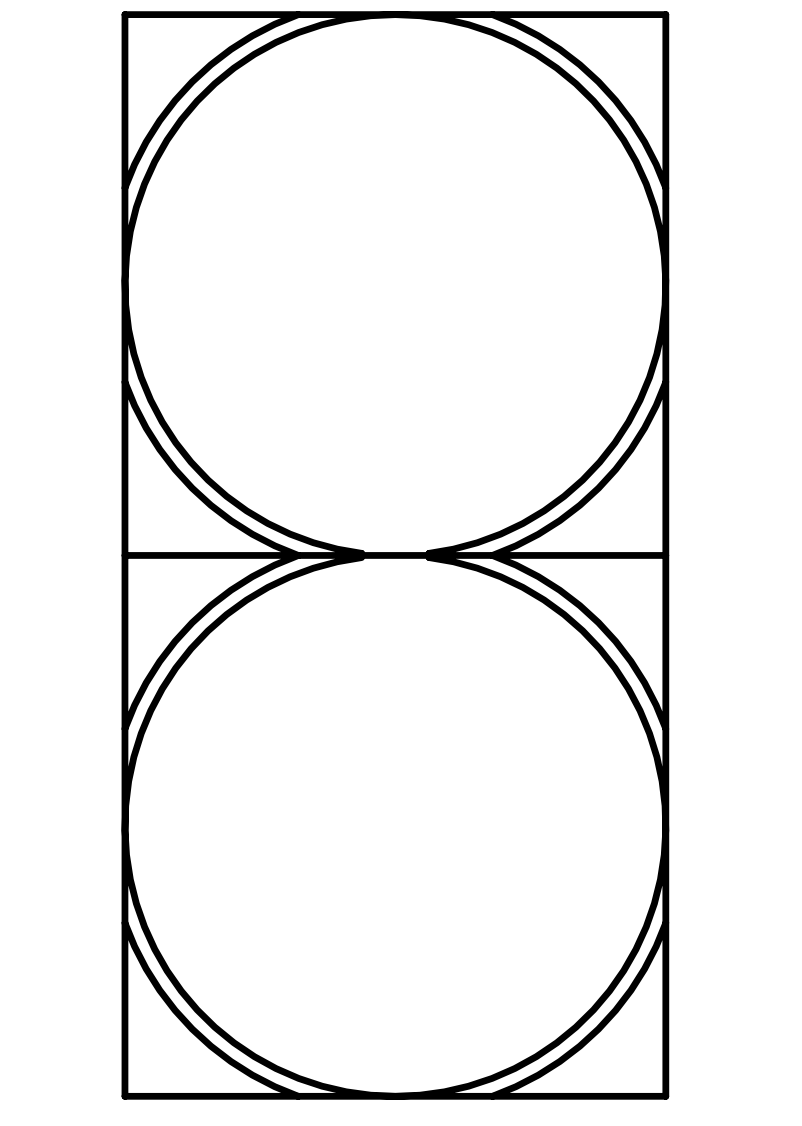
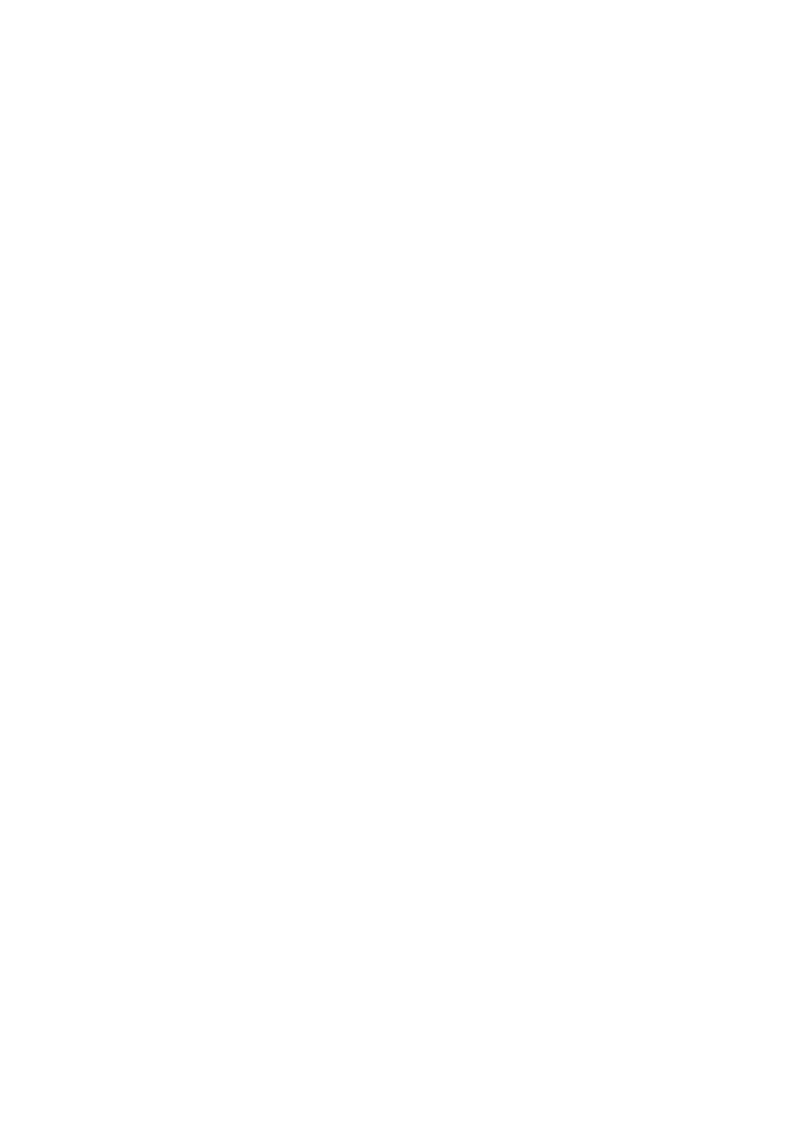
board edge: (298, 14) (274, 24) (231, 49) (192, 81) (175, 100) (146, 142) (124, 187) -> none
board edge: (492, 14) (538, 35) (579, 64) (598, 81) (631, 120) (644, 142) (665, 187) -> none
board edge: (665, 14) (665, 1096) (124, 1096) (124, 14) (665, 14) -> none
board edge: (124, 382) (146, 428) (175, 469) (192, 488) (231, 520) (252, 534) (298, 555) (252, 576) (231, 590) (192, 622) (175, 641) (146, 682) (124, 728) -> none
board edge: (665, 382) (656, 405) (631, 449) (598, 488) (559, 520) (538, 534) (492, 555) (538, 576) (579, 605) (598, 622) (631, 661) (644, 682) (665, 728) -> none
board edge: (361, 555) (361, 553) (337, 549) (290, 534) (246, 510) (208, 480) (175, 442) (150, 400) (133, 353) (125, 305) (126, 255) (136, 207) (154, 161) (181, 119) (214, 83) (254, 54) (298, 32) (346, 19) (370, 15) (420, 15) (468, 24) (514, 42) (556, 68) (593, 101) (623, 140) (646, 184) (660, 231) (665, 280) (662, 329) (649, 377) (628, 422) (599, 462) (564, 496) (522, 523) (477, 542) (429, 553) (429, 557) (453, 561) (500, 576) (544, 600) (582, 630) (615, 668) (628, 688) (649, 733) (662, 781) (665, 805) (664, 855) (654, 903) (636, 949) (623, 970) (609, 991) (575, 1027) (536, 1056) (514, 1068) (468, 1086) (420, 1095) (370, 1095) (322, 1086) (276, 1068) (233, 1042) (197, 1009) (167, 970) (154, 949) (136, 903) (126, 855) (125, 830) (128, 781) (141, 733) (162, 688) (191, 648) (226, 614) (267, 587) (313, 568) (361, 557) -> none
board edge: (665, 555) (124, 555) -> none
board edge: (124, 922) (134, 946) (159, 990) (192, 1029) (231, 1061) (252, 1075) (298, 1096) -> none
board edge: (665, 922) (644, 968) (631, 990) (598, 1029) (579, 1046) (538, 1075) (492, 1096) -> none

